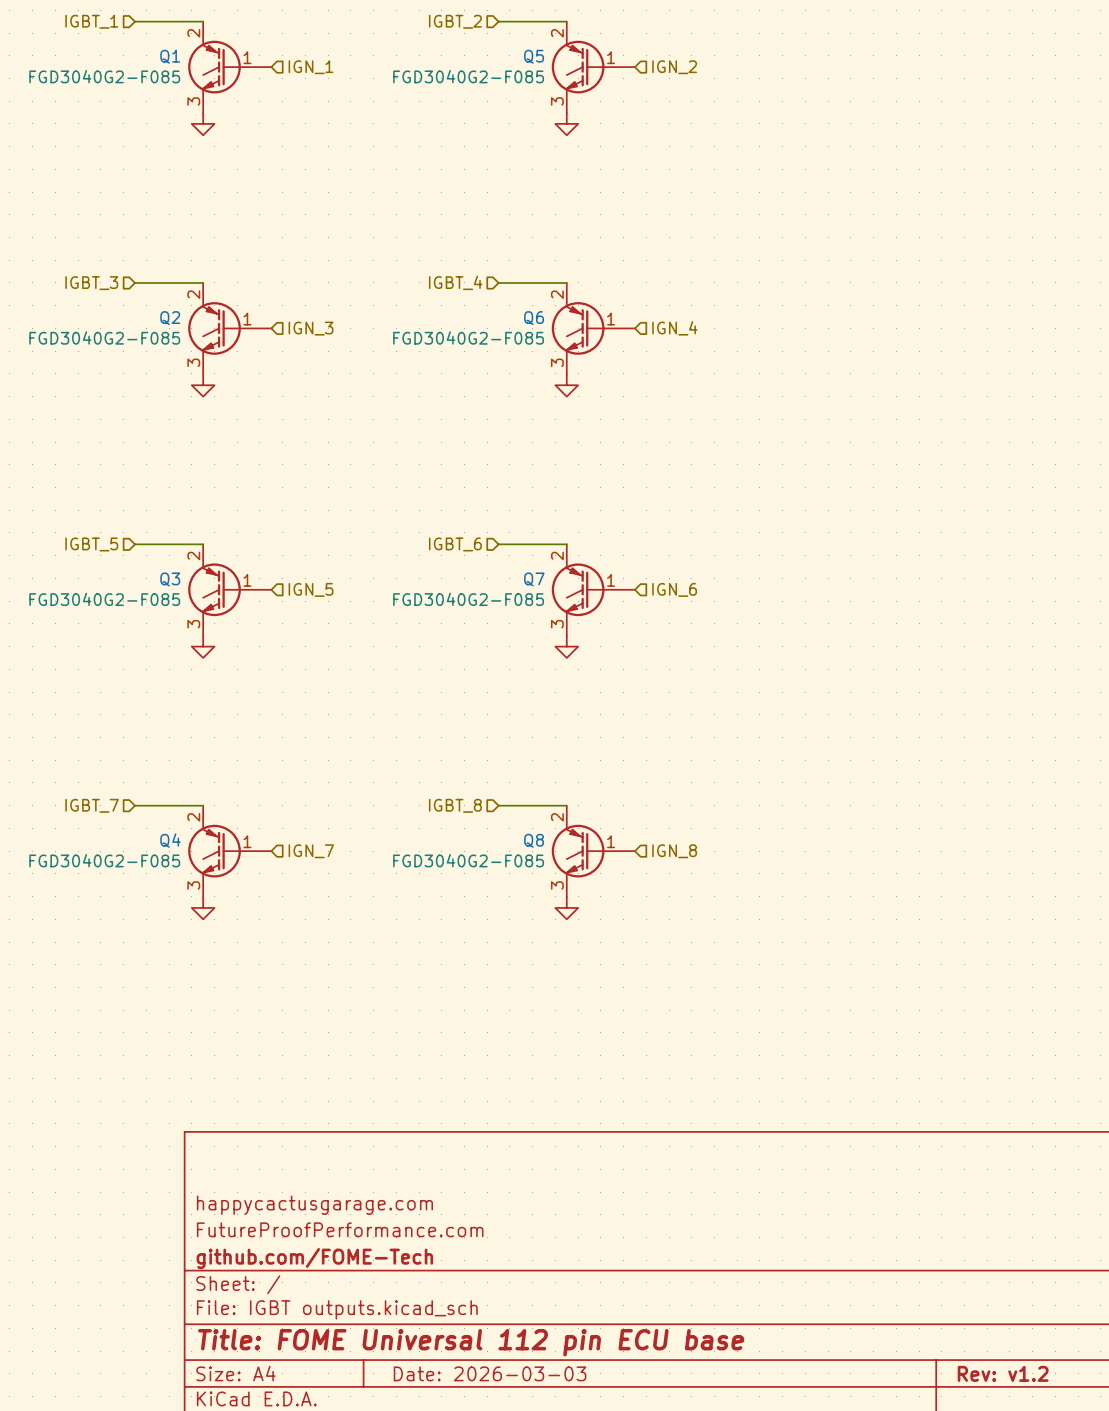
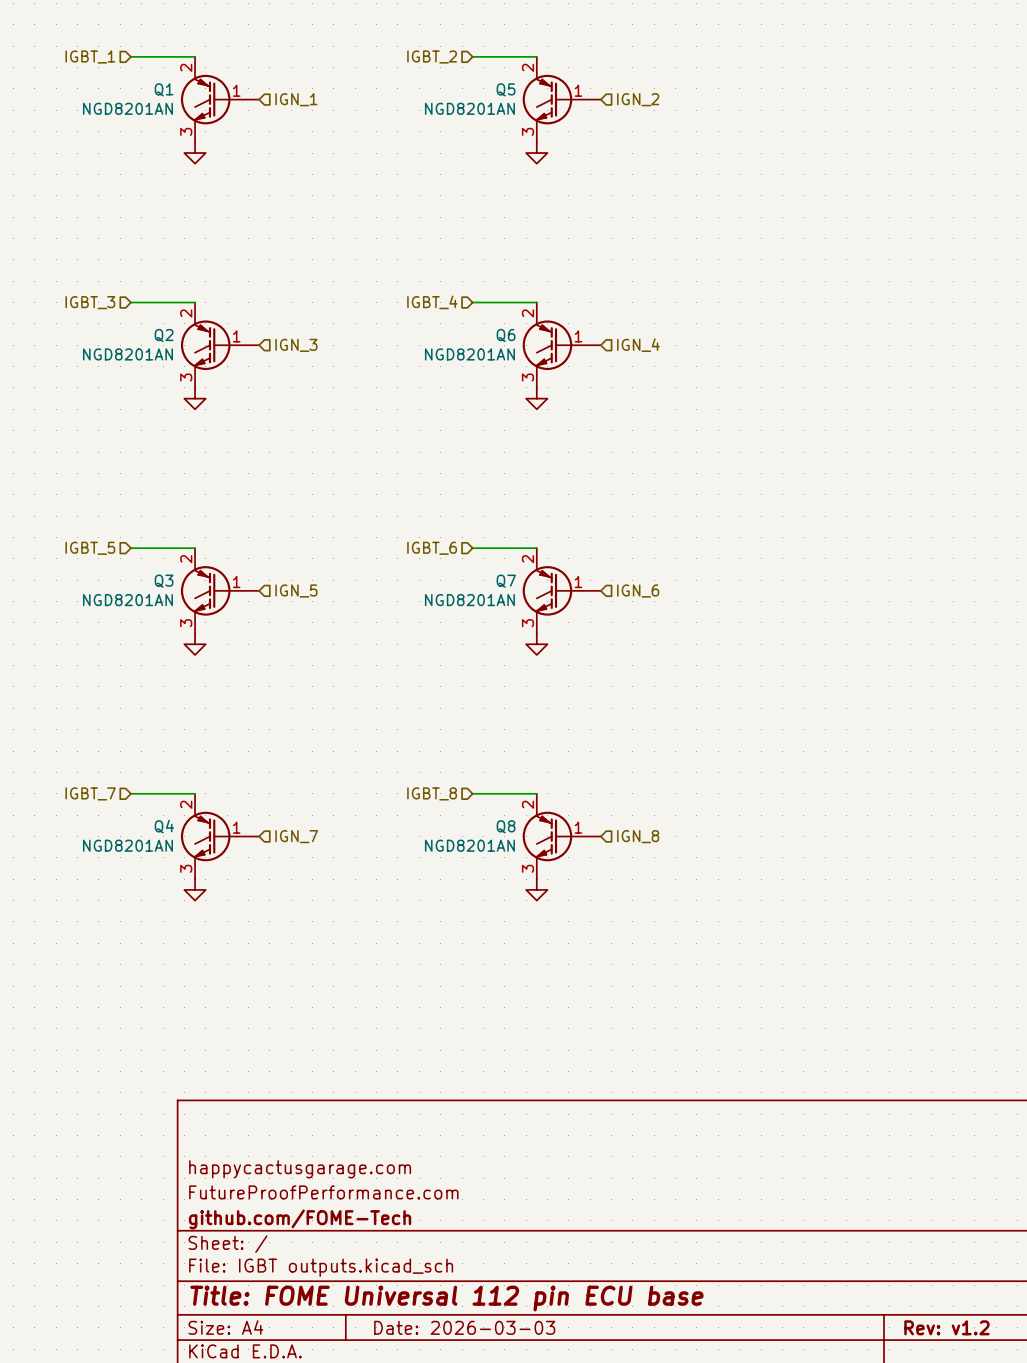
Q1 value: FGD3040G2-F085 (104, 76) -> NGD8201AN (127, 108)
Q5 value: FGD3040G2-F085 (468, 76) -> NGD8201AN (469, 108)
Q2 value: FGD3040G2-F085 (104, 337) -> NGD8201AN (127, 354)
Q6 value: FGD3040G2-F085 (468, 337) -> NGD8201AN (469, 354)
Q3 value: FGD3040G2-F085 (104, 599) -> NGD8201AN (127, 600)
Q7 value: FGD3040G2-F085 (468, 599) -> NGD8201AN (469, 600)
Q4 value: FGD3040G2-F085 (104, 860) -> NGD8201AN (127, 845)
Q8 value: FGD3040G2-F085 (468, 860) -> NGD8201AN (469, 845)

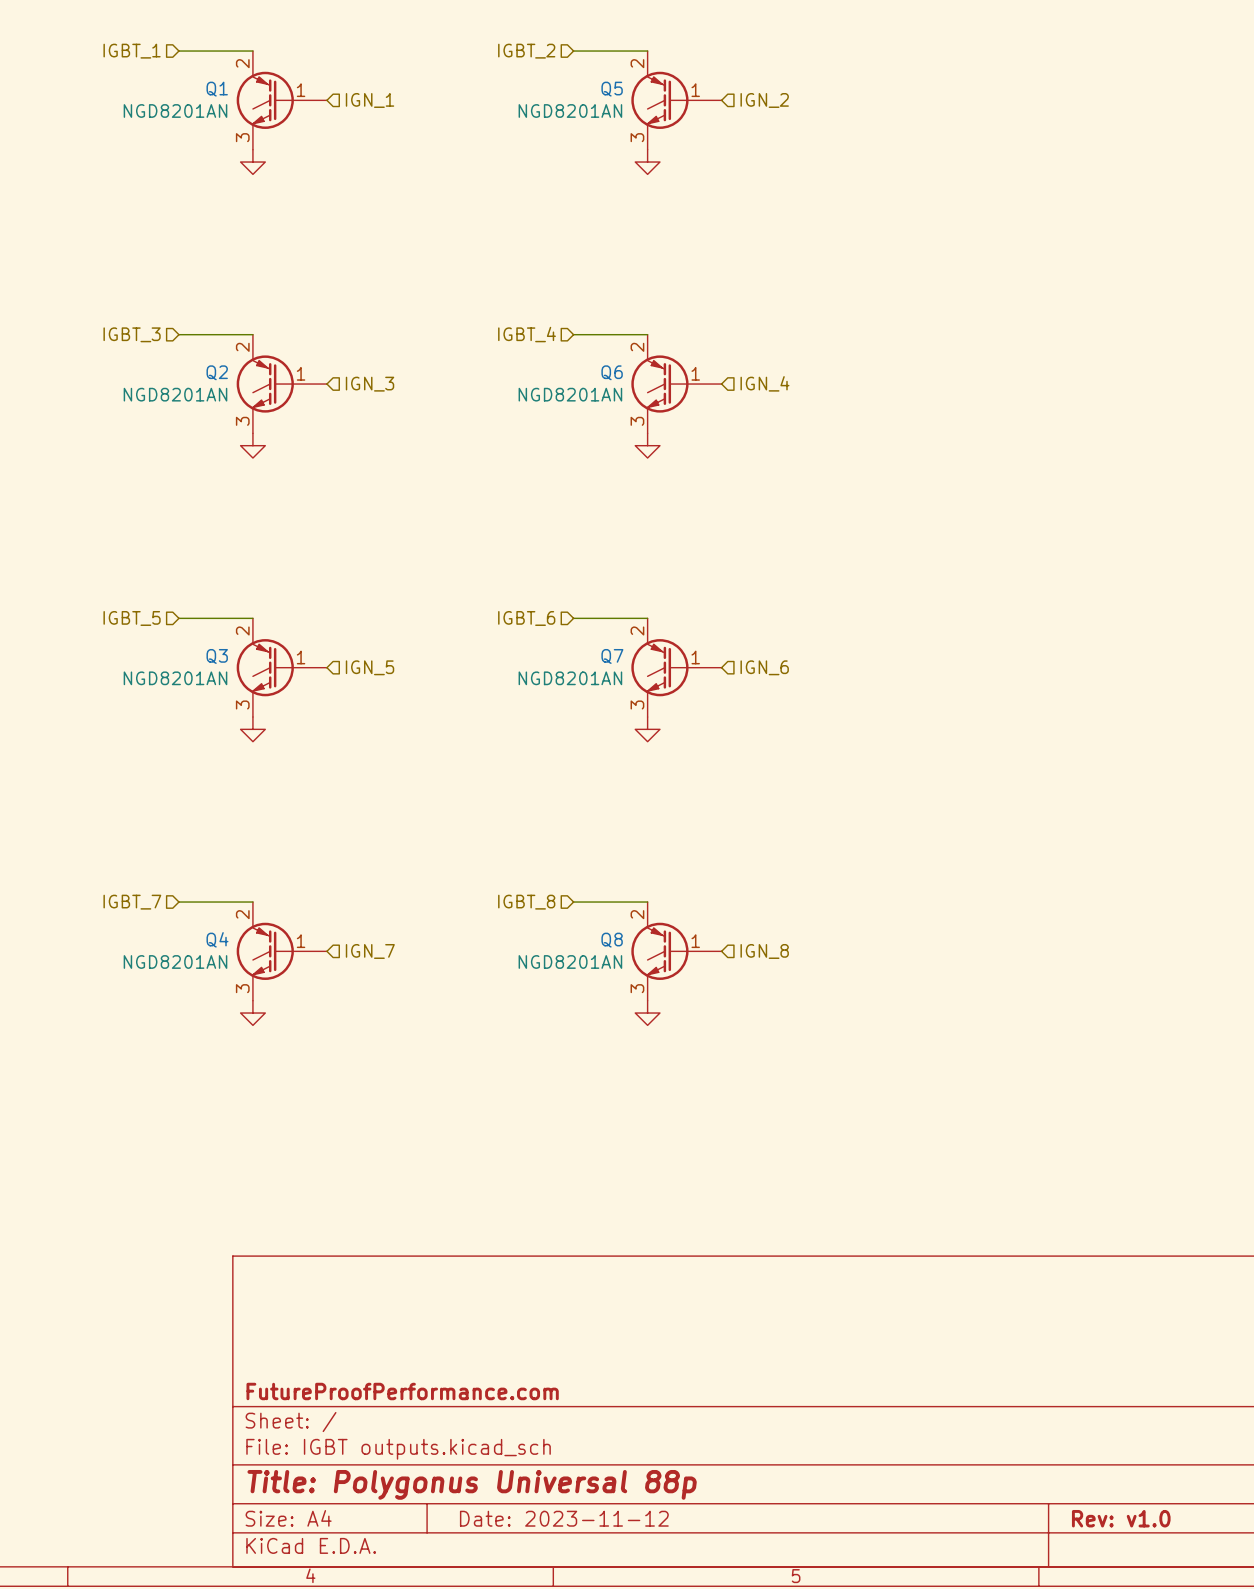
title block: happycactusgarage.com (300, 1169) -> none
title block: FutureProofPerformance.com (323, 1192) -> none
title block: github.com/FOME-Tech (300, 1219) -> FutureProofPerformance.com (402, 1391)
title block: Title: FOME Universal 112 pin ECU base (446, 1298) -> Title: Polygonus Universal 88p (472, 1484)
title block: Date: 2026-03-03 (464, 1327) -> Date: 2023-11-12 (564, 1518)
title block: Rev: v1.2 (946, 1327) -> Rev: v1.0 (1121, 1518)

